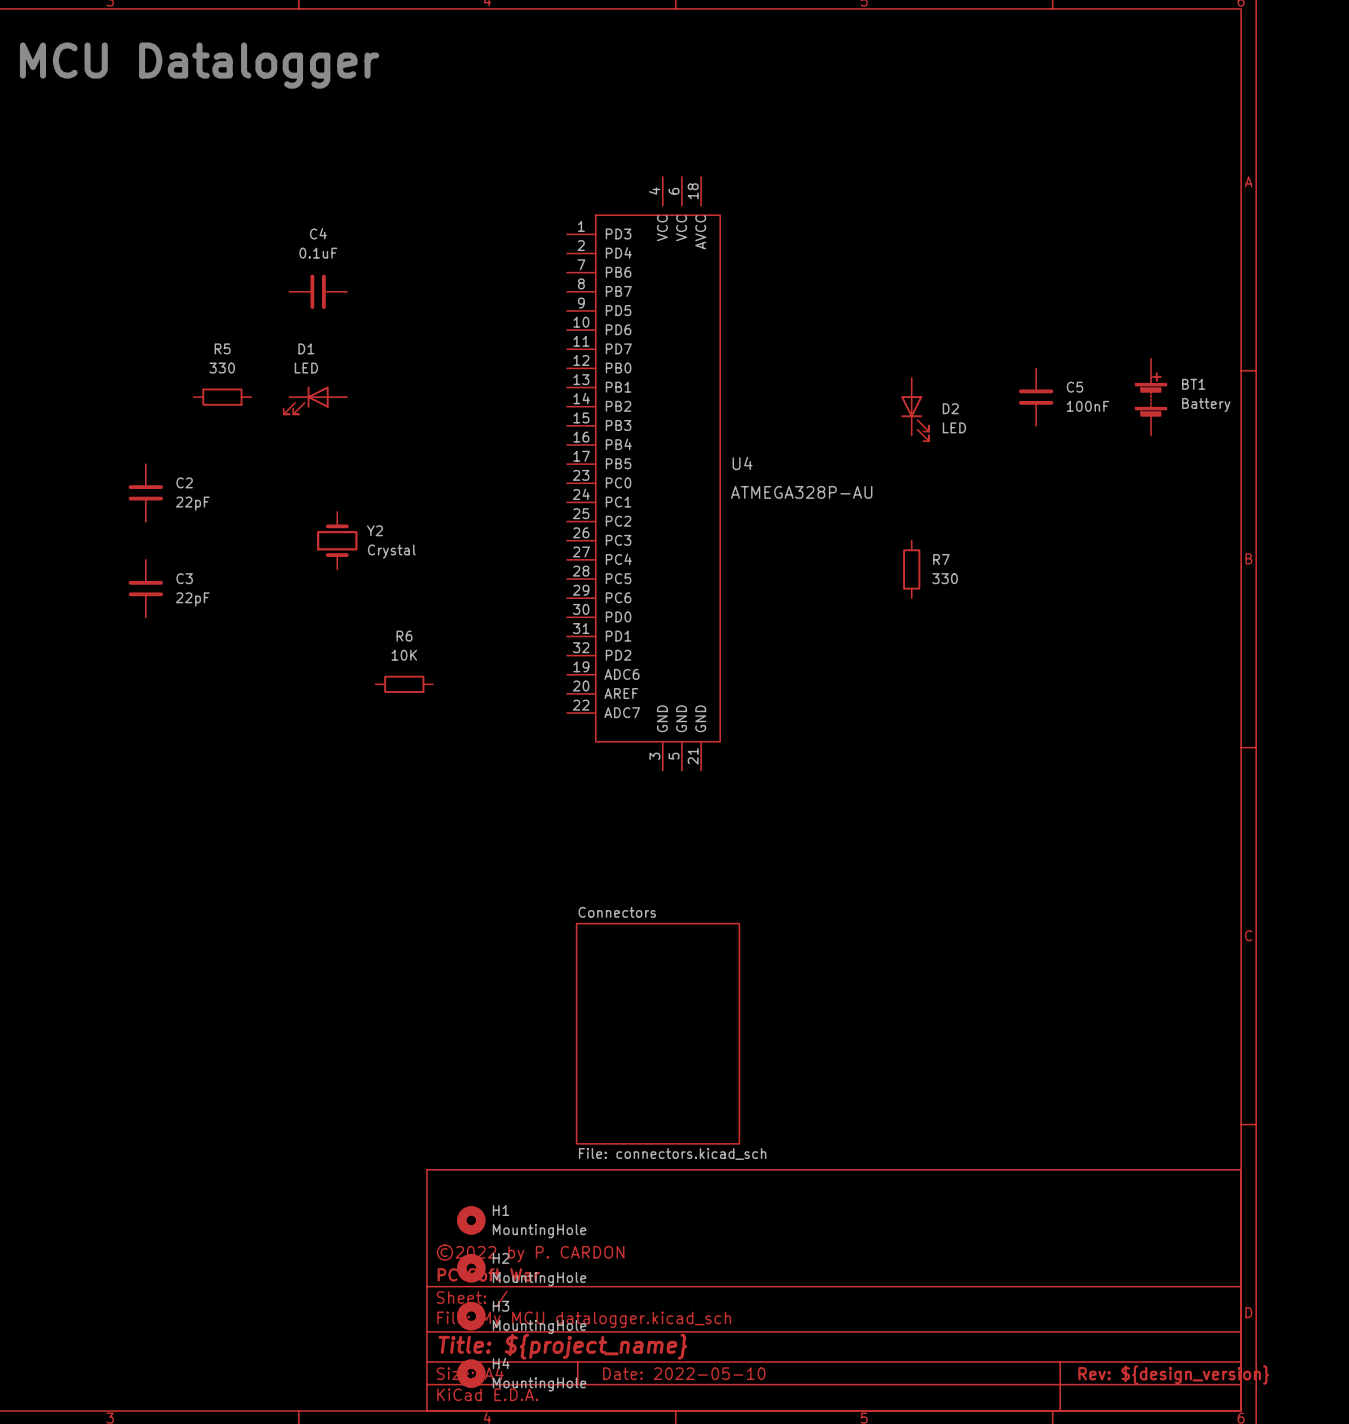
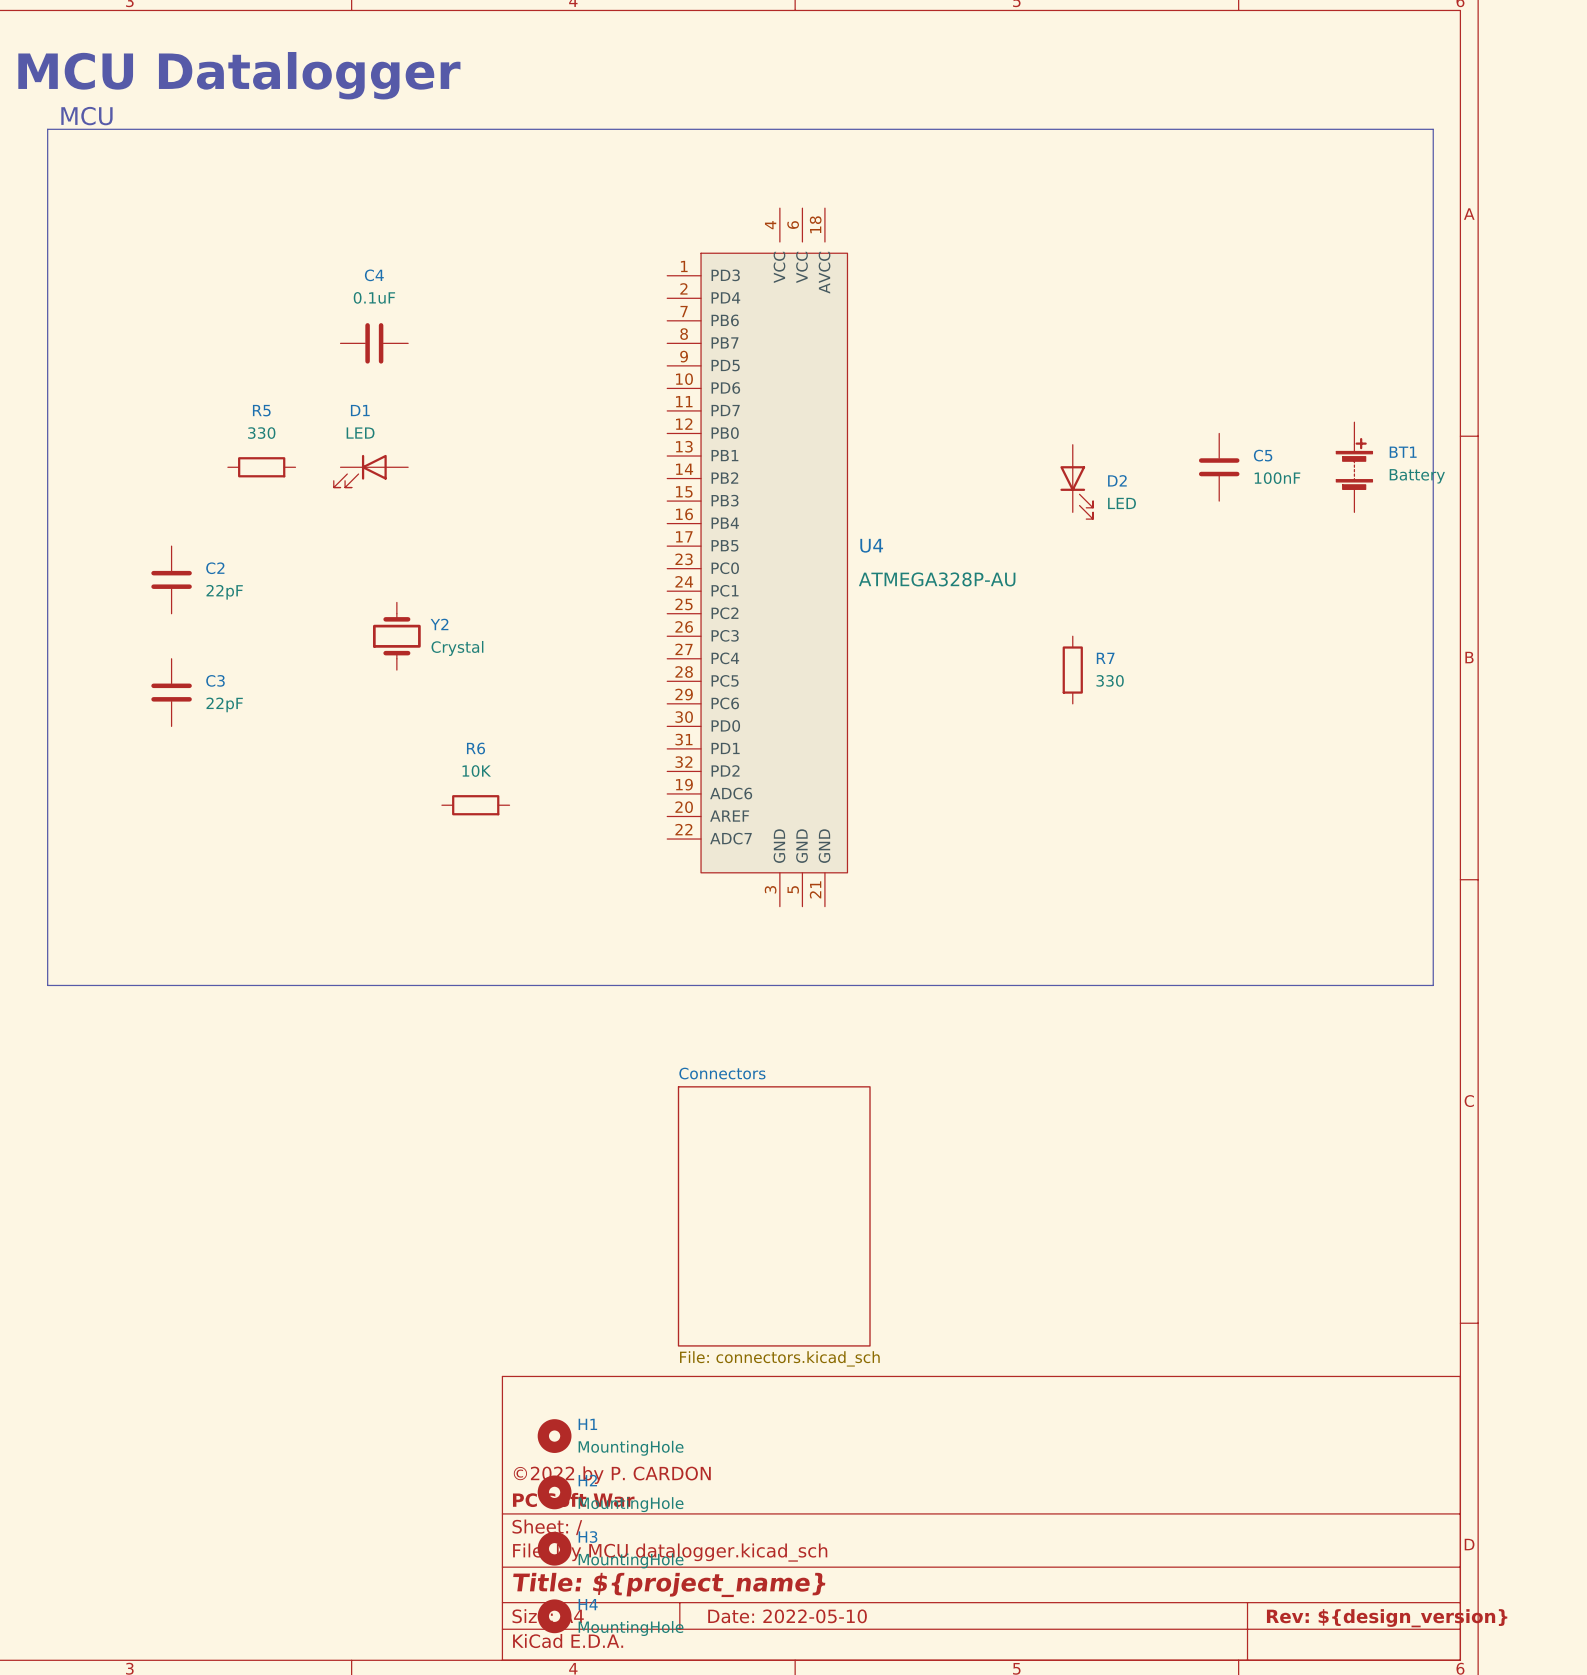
text: none -> MCU (86, 116)
line: none -> (47, 129) (47, 985) (1433, 985) (1433, 129) (47, 129)

